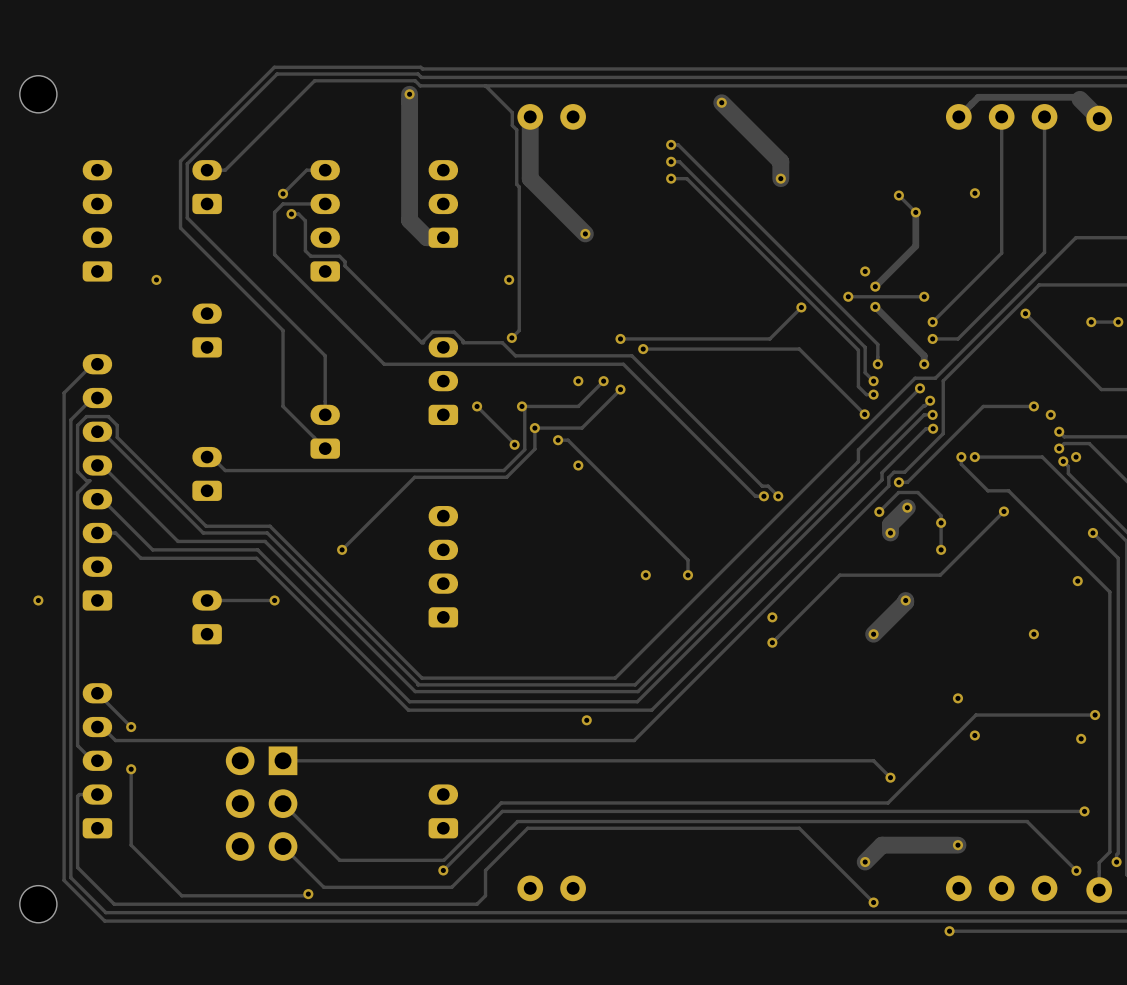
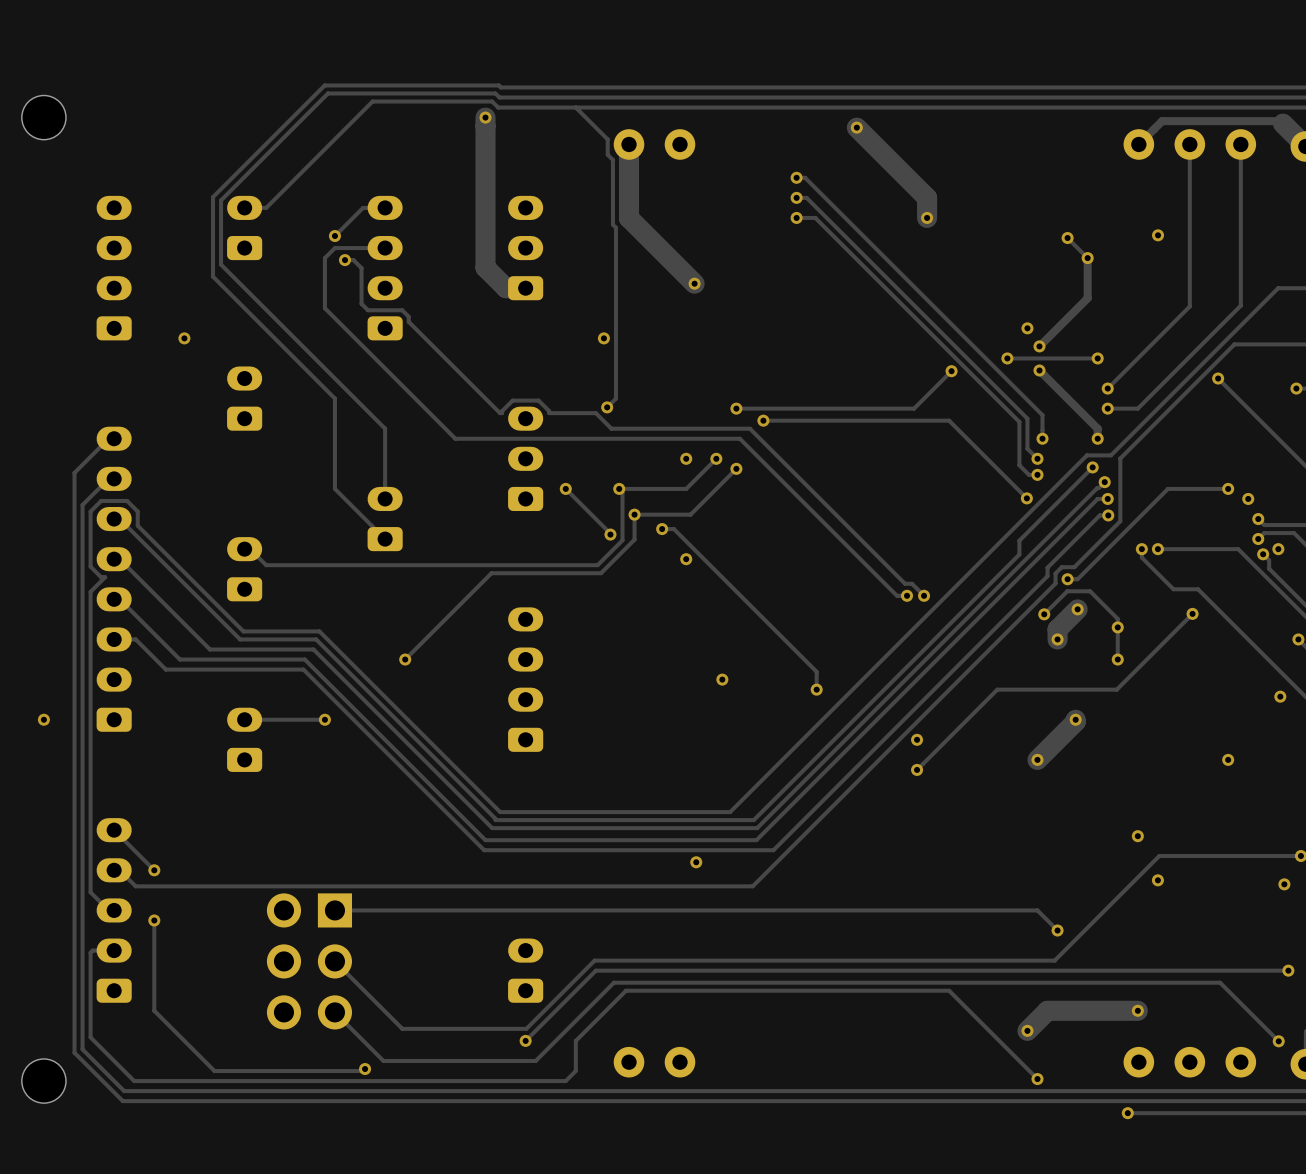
via position: (645, 575) -> (722, 679)

